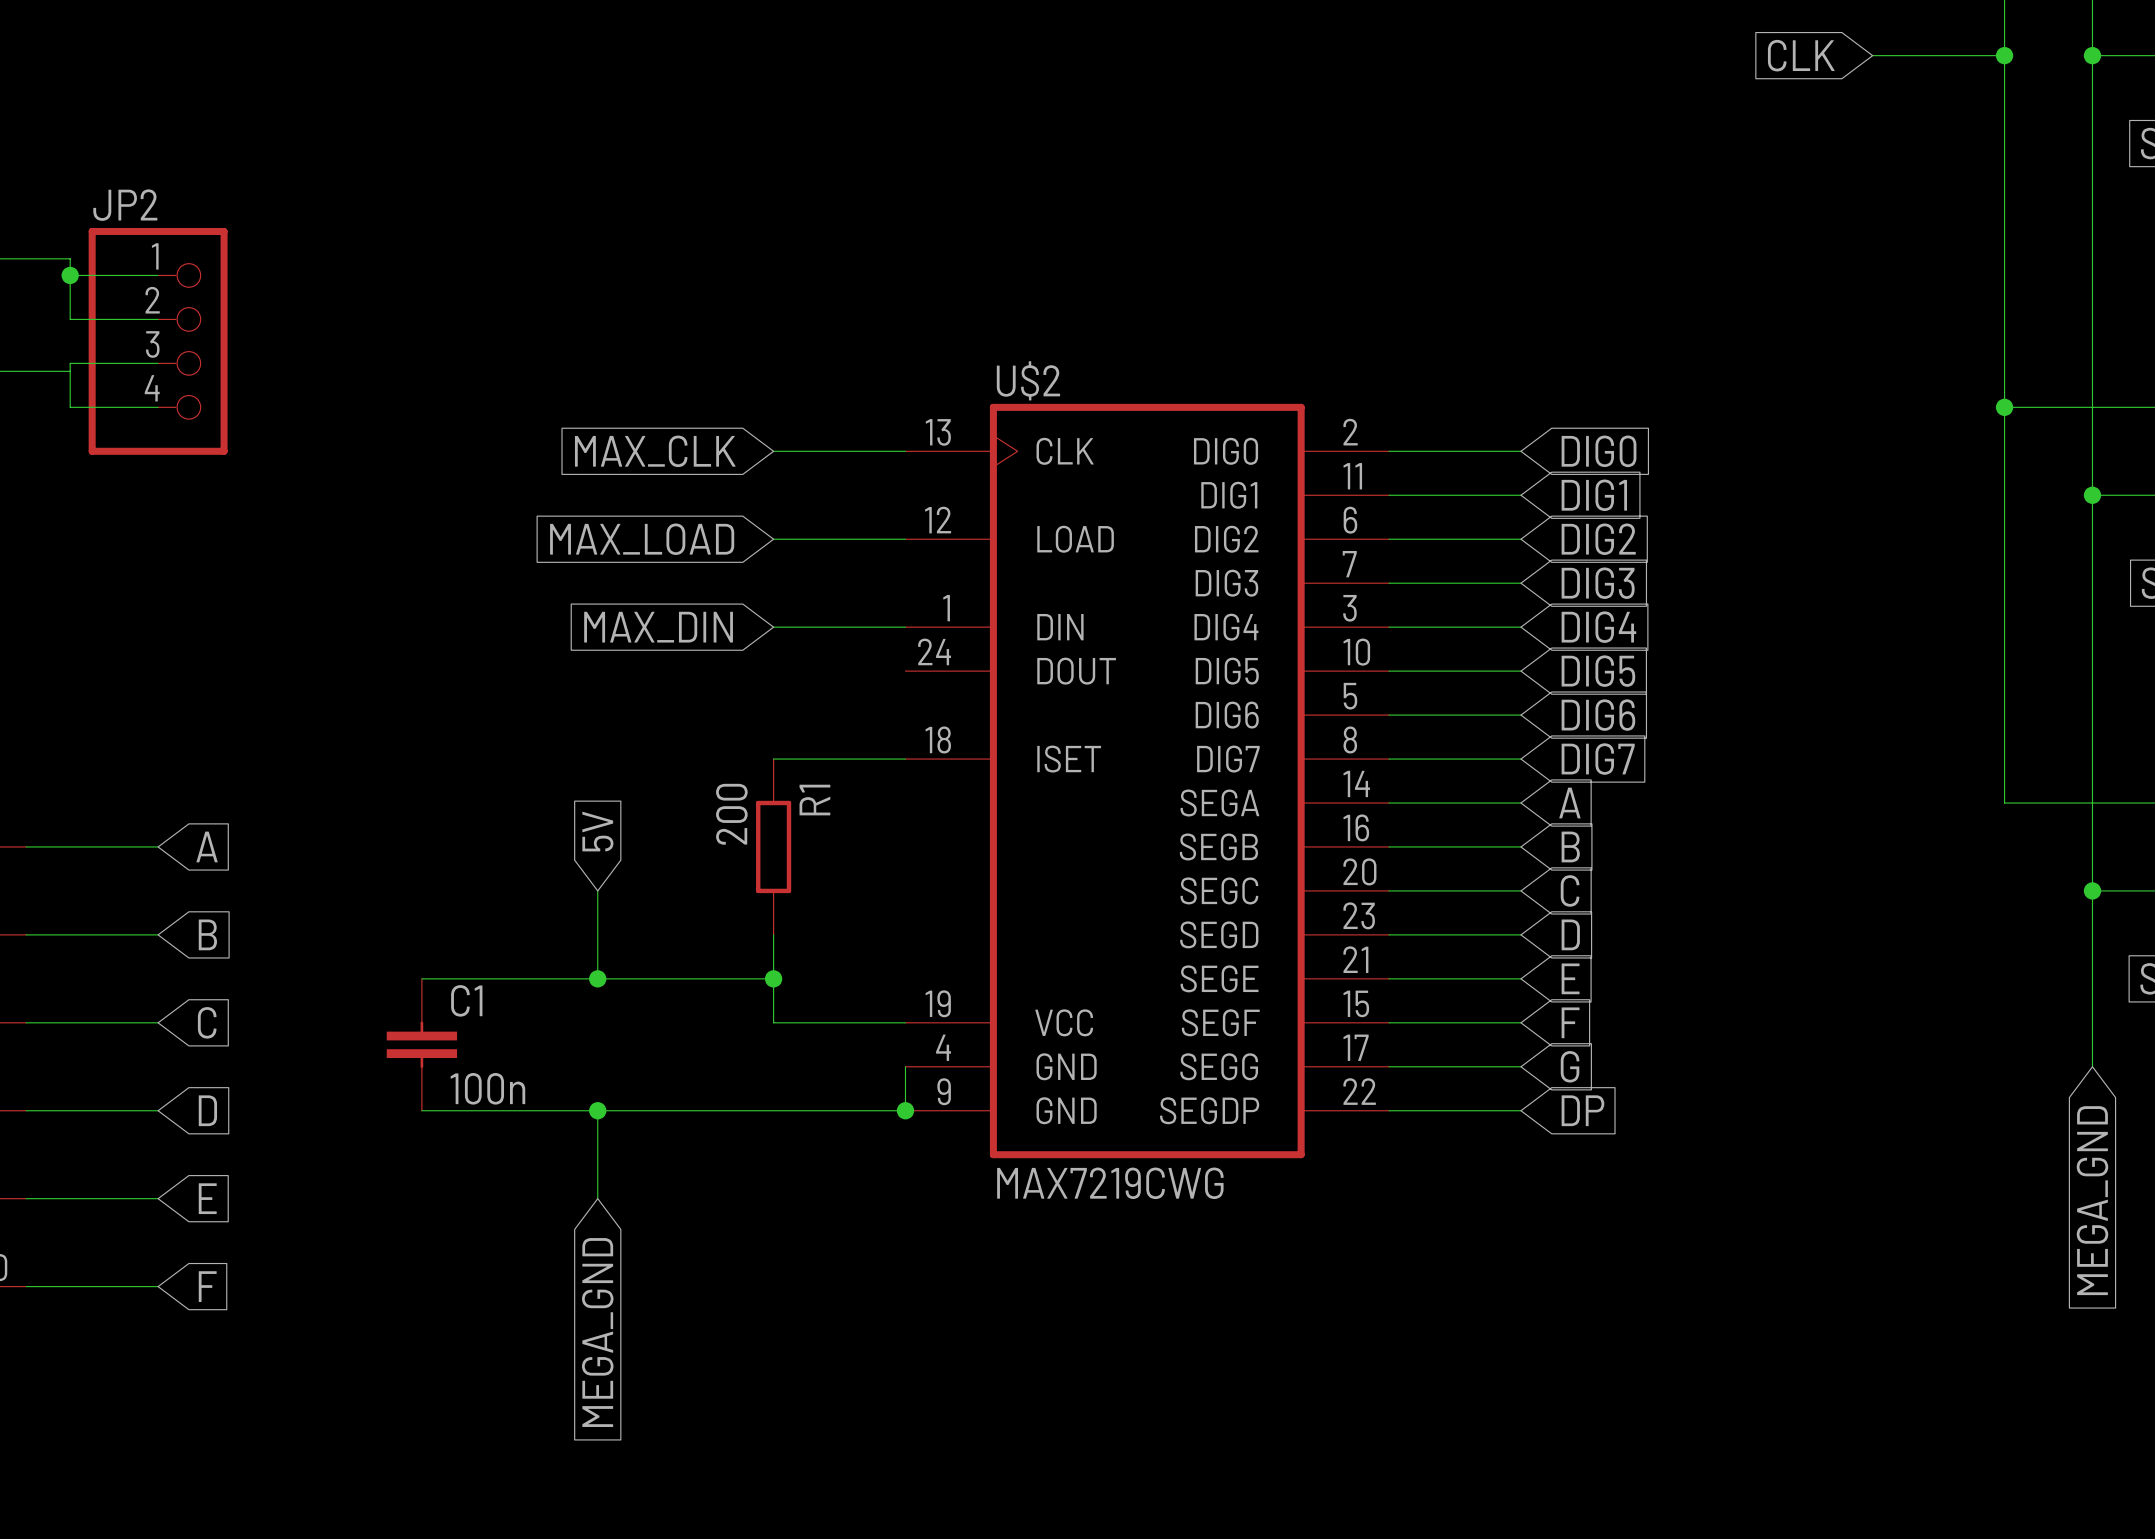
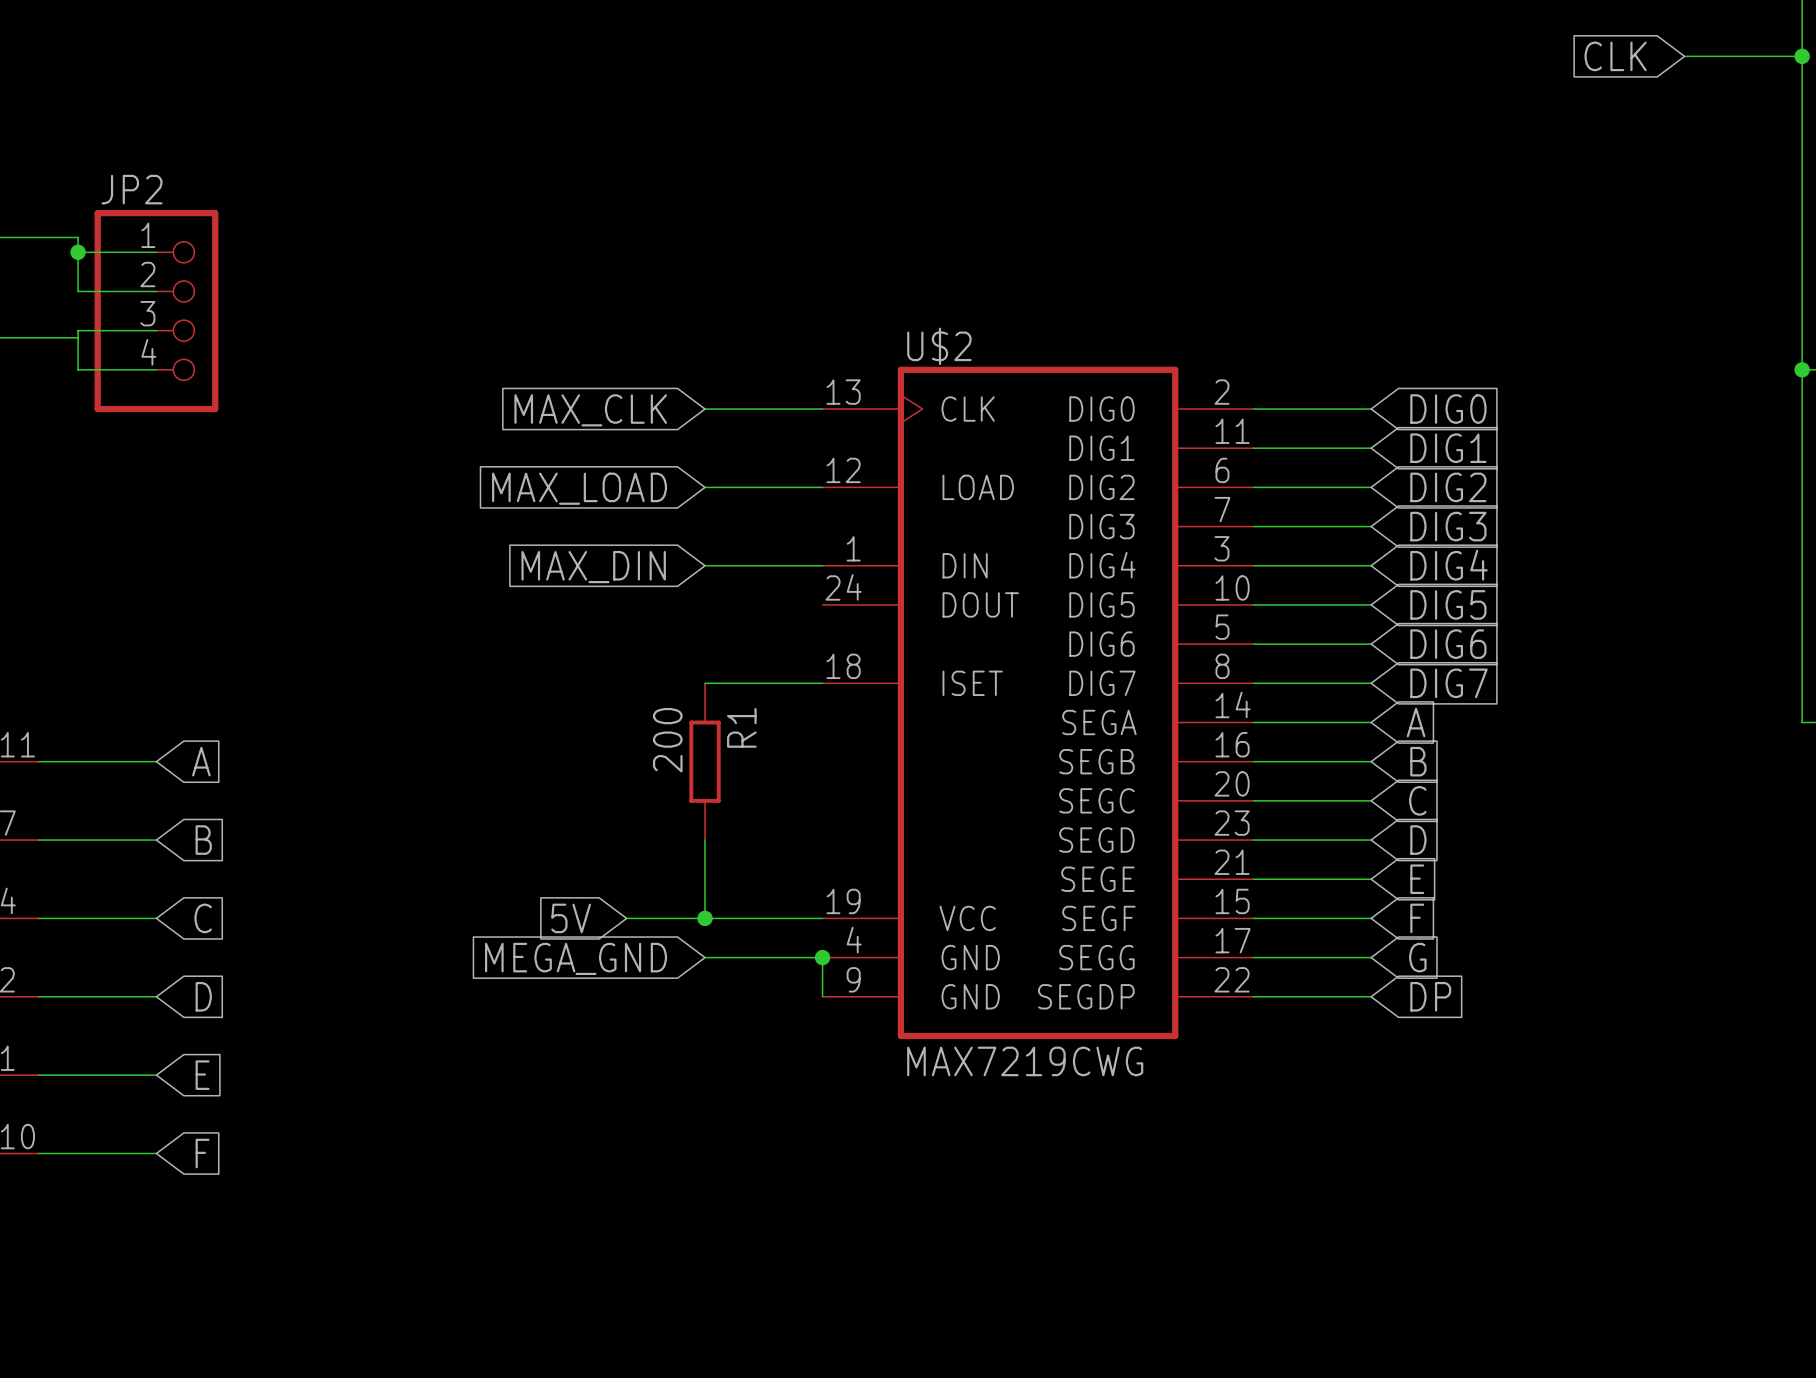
global label rotation: 0° (597, 831) -> 90° counterclockwise (571, 918)
global label position: 5V (597, 831) -> 5V (571, 918)
wire: (597, 890) (597, 978) -> none
wire: (421, 978) (773, 978) -> none
junction: (597, 978) -> none
junction position: (773, 978) -> (705, 918)
wire: none -> (626, 918) (705, 918)
C1: 100n (421, 1044) -> none
wire: none -> (705, 957) (822, 957)
wire: (421, 1110) (905, 1110) -> none
wire: (597, 1110) (597, 1198) -> none
junction: (597, 1110) -> none
junction position: (905, 1110) -> (822, 957)
global label rotation: 0° (597, 1332) -> 90° clockwise (576, 958)

